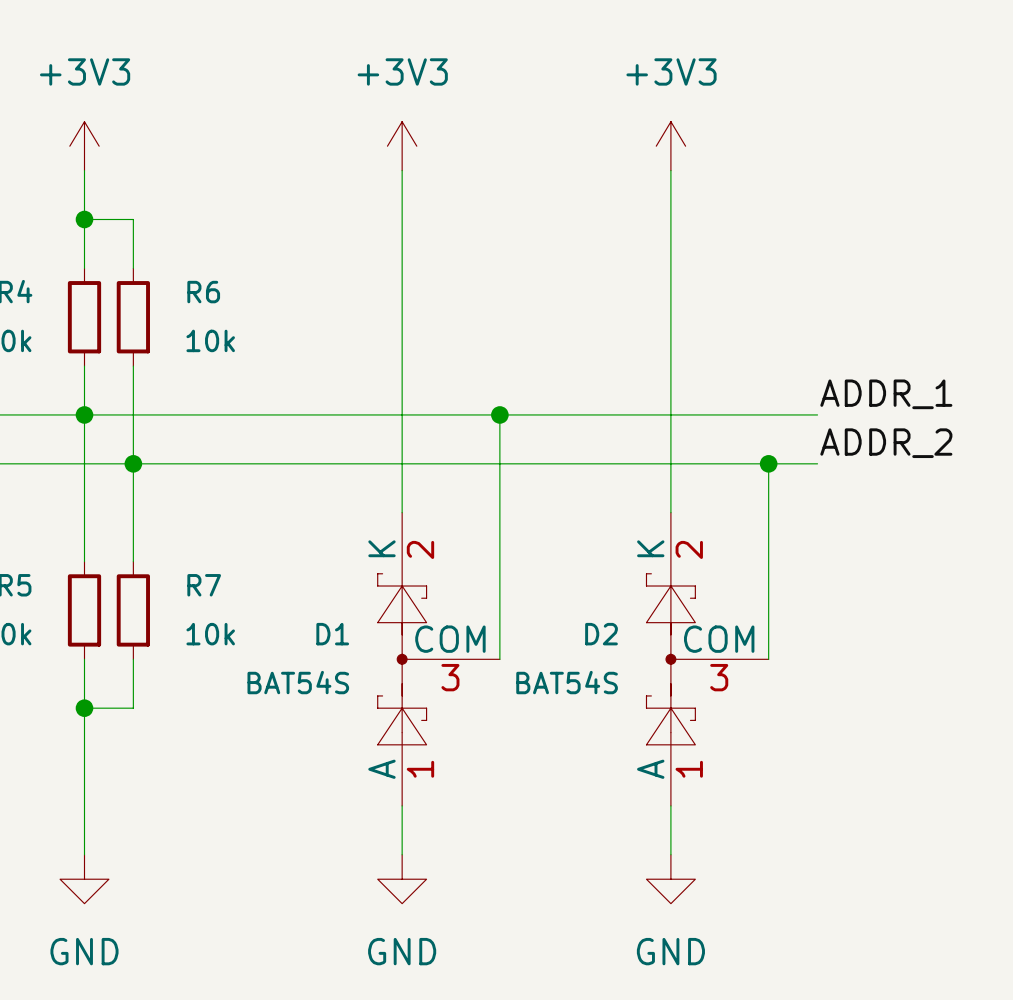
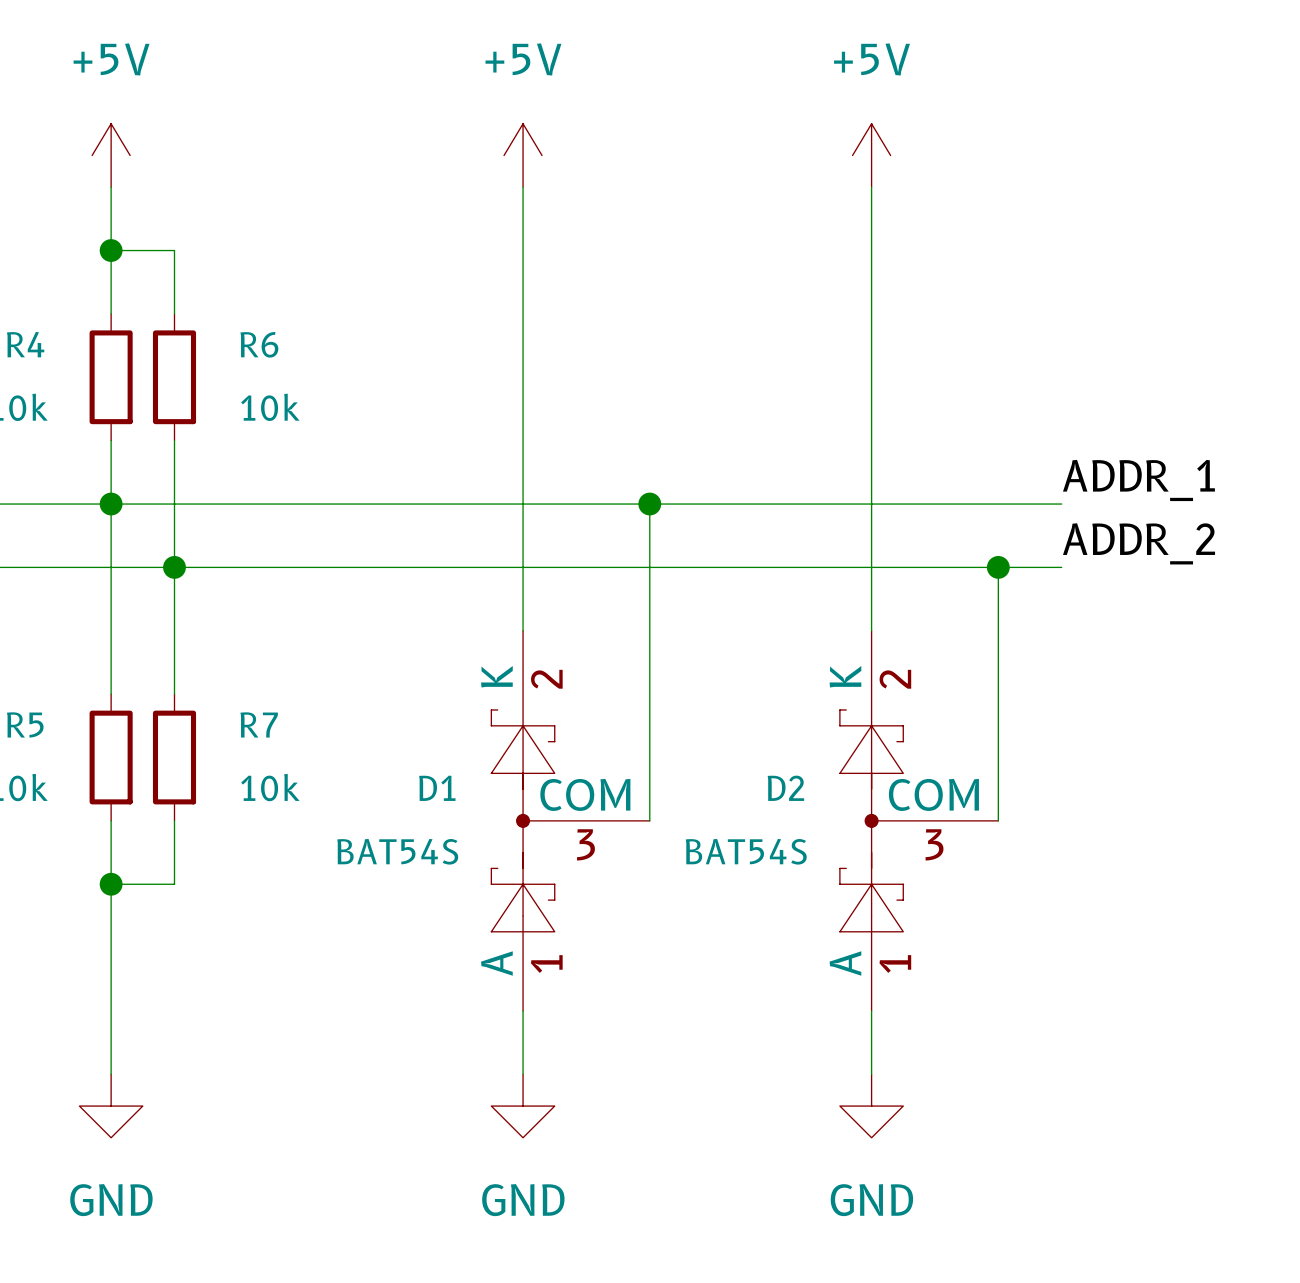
power symbol: +3V3 (84, 146) -> +5V (111, 155)
power symbol: +3V3 (402, 146) -> +5V (523, 155)
power symbol: +3V3 (670, 146) -> +5V (871, 155)

